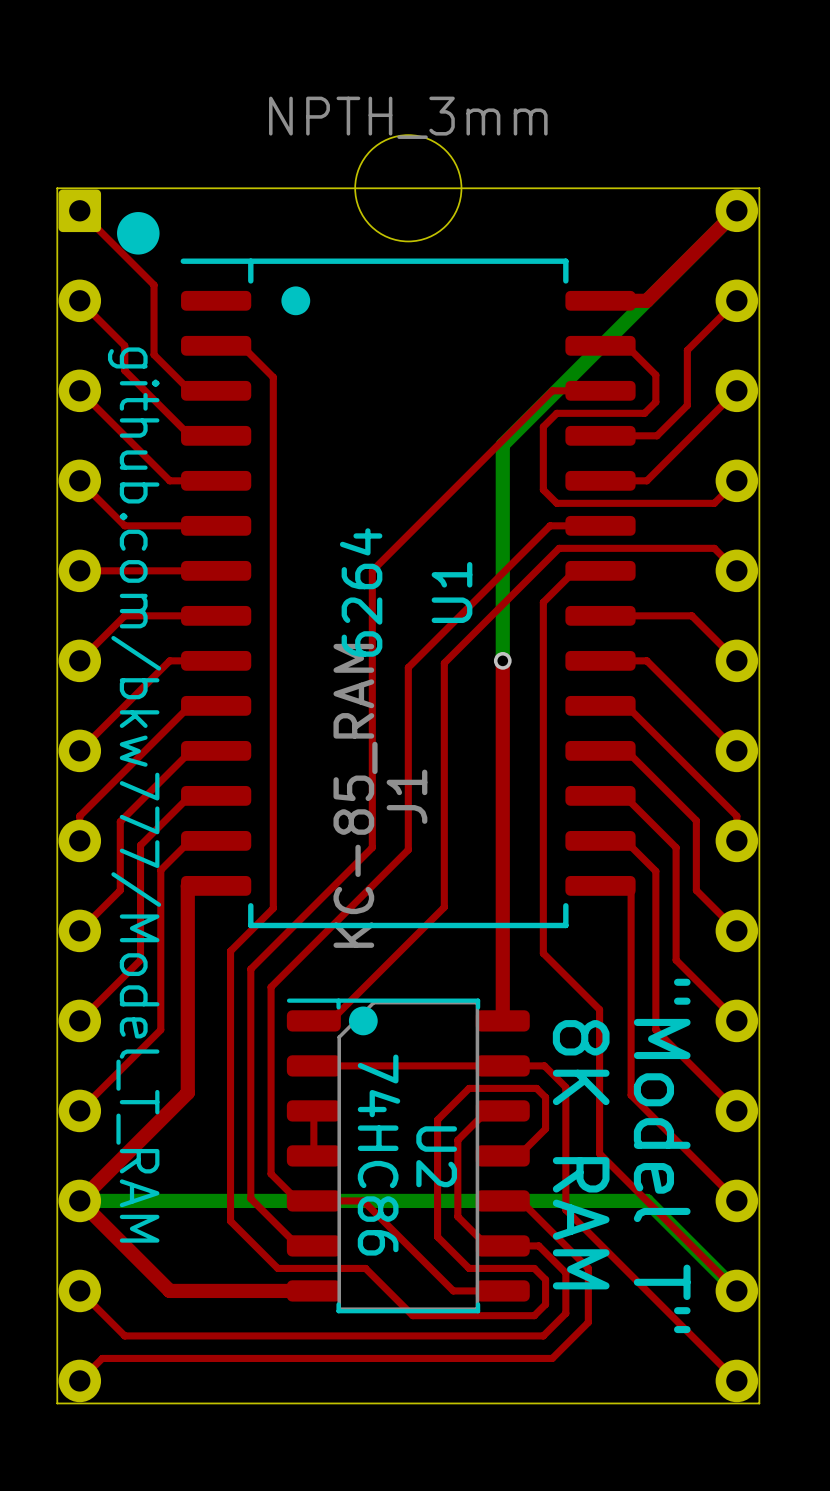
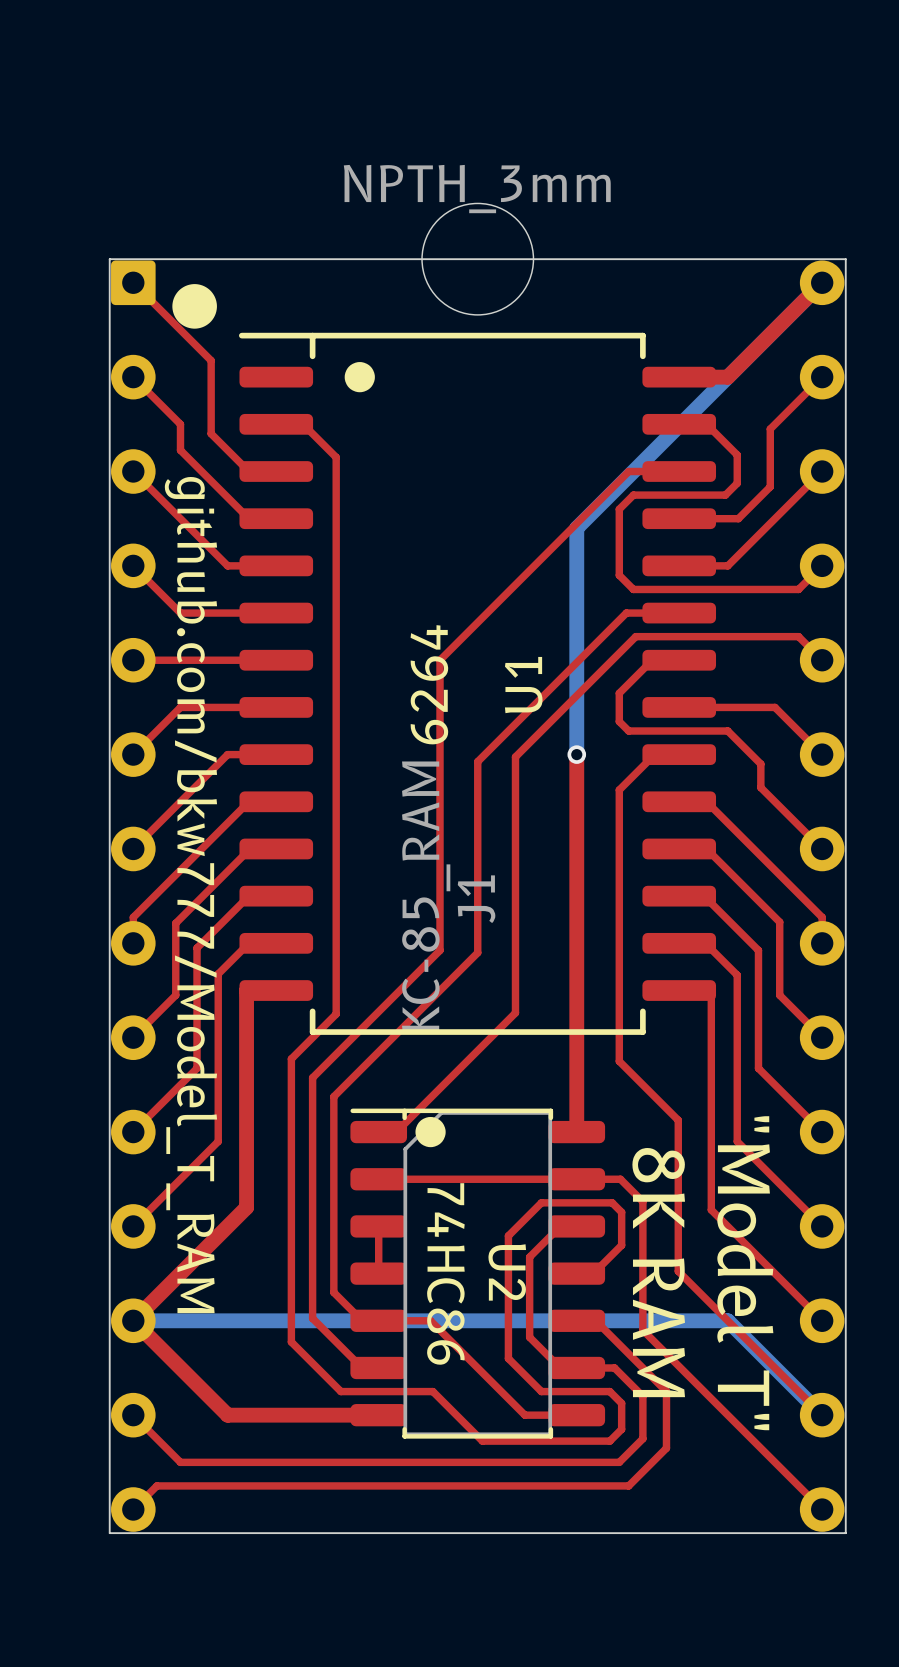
top track: (543, 629) (543, 694) -> (679, 754) (654, 754) (619, 789)
top track: (600, 660) (646, 660) (678, 692) -> (619, 721) (628, 731) (727, 731) (760, 764) (760, 787)

